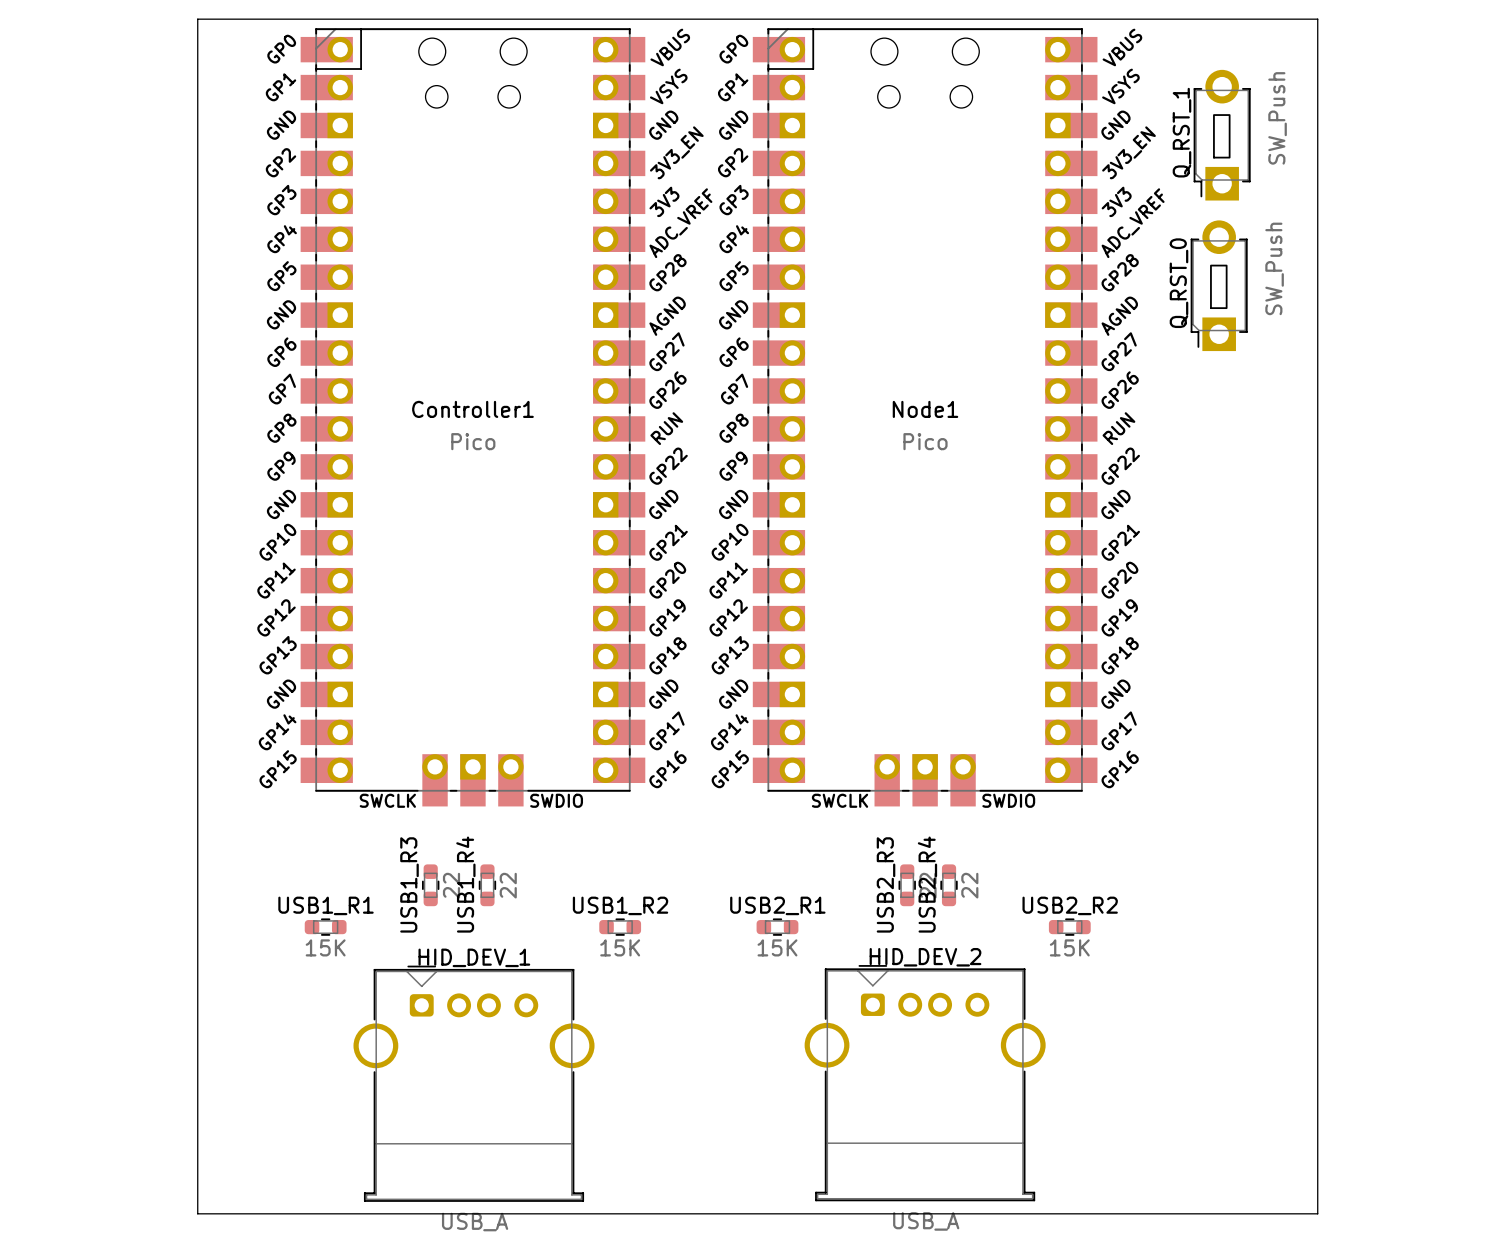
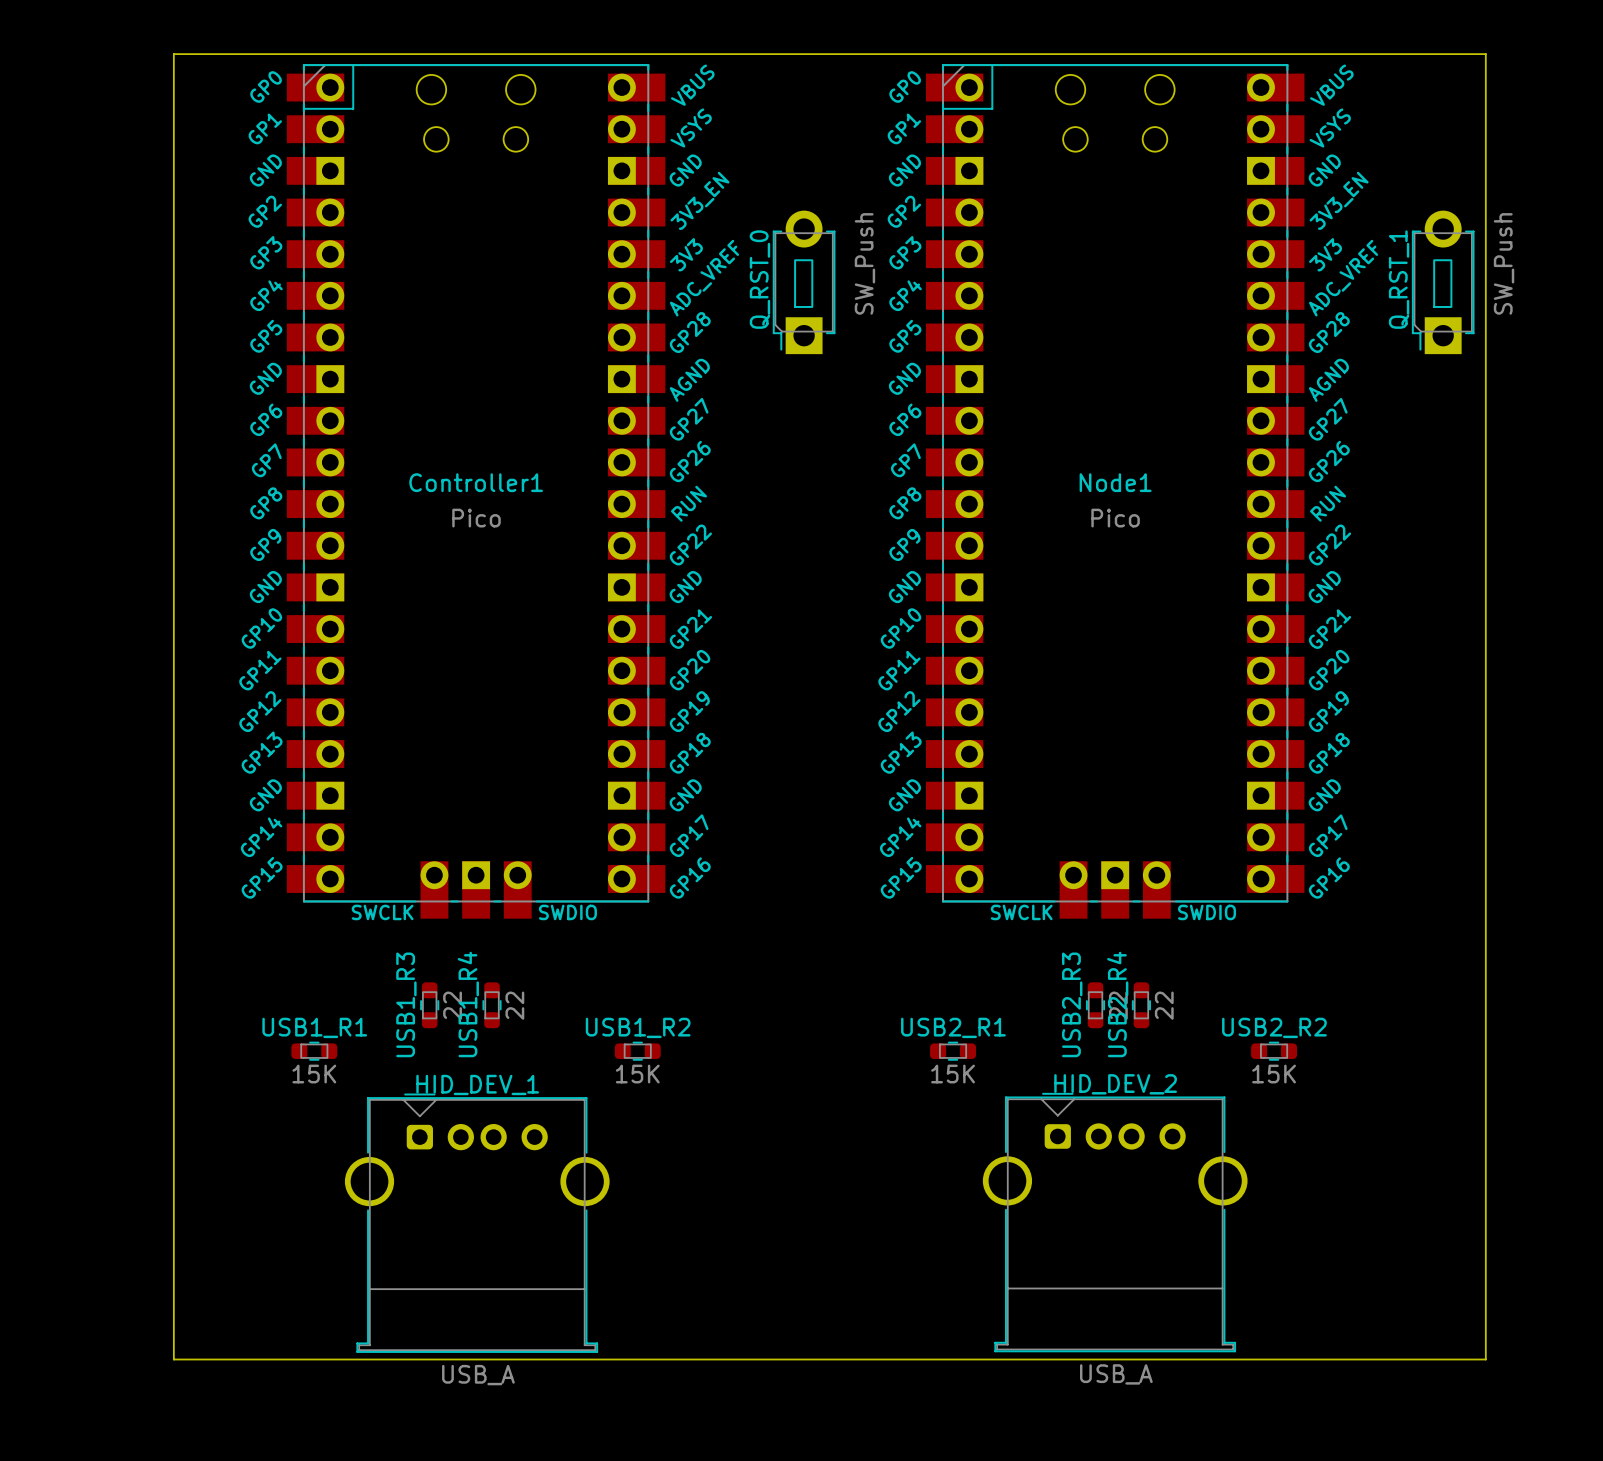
board edge: (1317, 19) (1317, 1213) (197, 1213) (197, 1207) -> (1403, 54) (1485, 54) (1485, 1359) (173, 1359)
Q_RST_1 position: (1222, 135) -> (1443, 282)
Q_RST_0 position: (1219, 285) -> (804, 282)
Node1 position: (925, 417) -> (1115, 491)
USB2_R3 position: (907, 885) -> (1095, 1005)
USB2_R4 position: (949, 885) -> (1141, 1005)
USB2_R1 position: (777, 927) -> (953, 1051)
USB2_R2 position: (1069, 927) -> (1274, 1051)
HID_DEV_2 position: (925, 1083) -> (1115, 1222)

